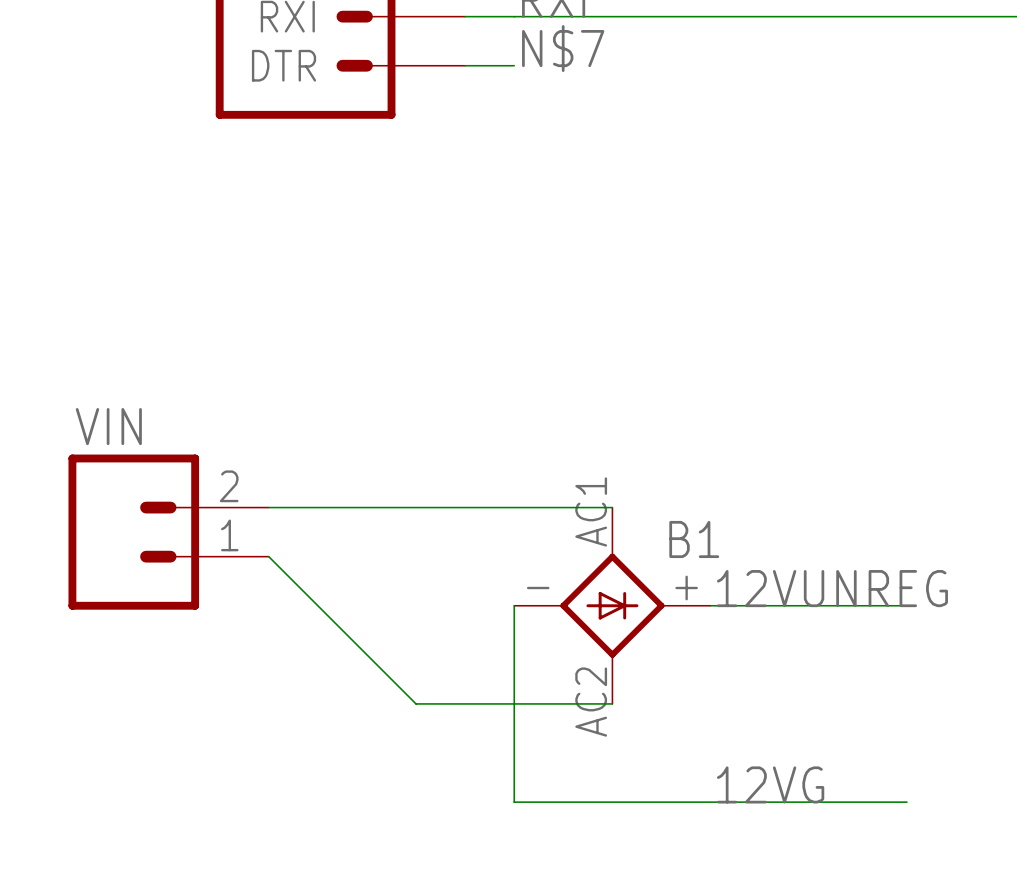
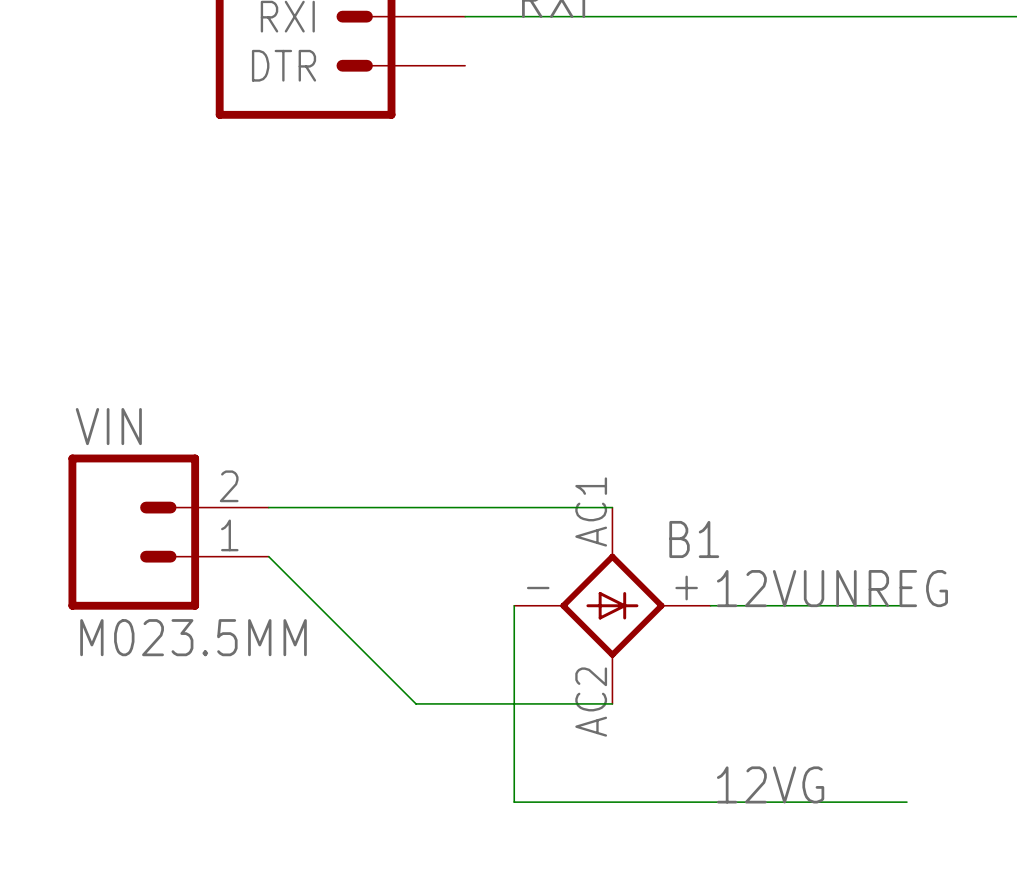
label: N$7 (563, 48) -> none
wire: (465, 65) (514, 65) -> none
VIN value: none -> M023.5MM (193, 637)

